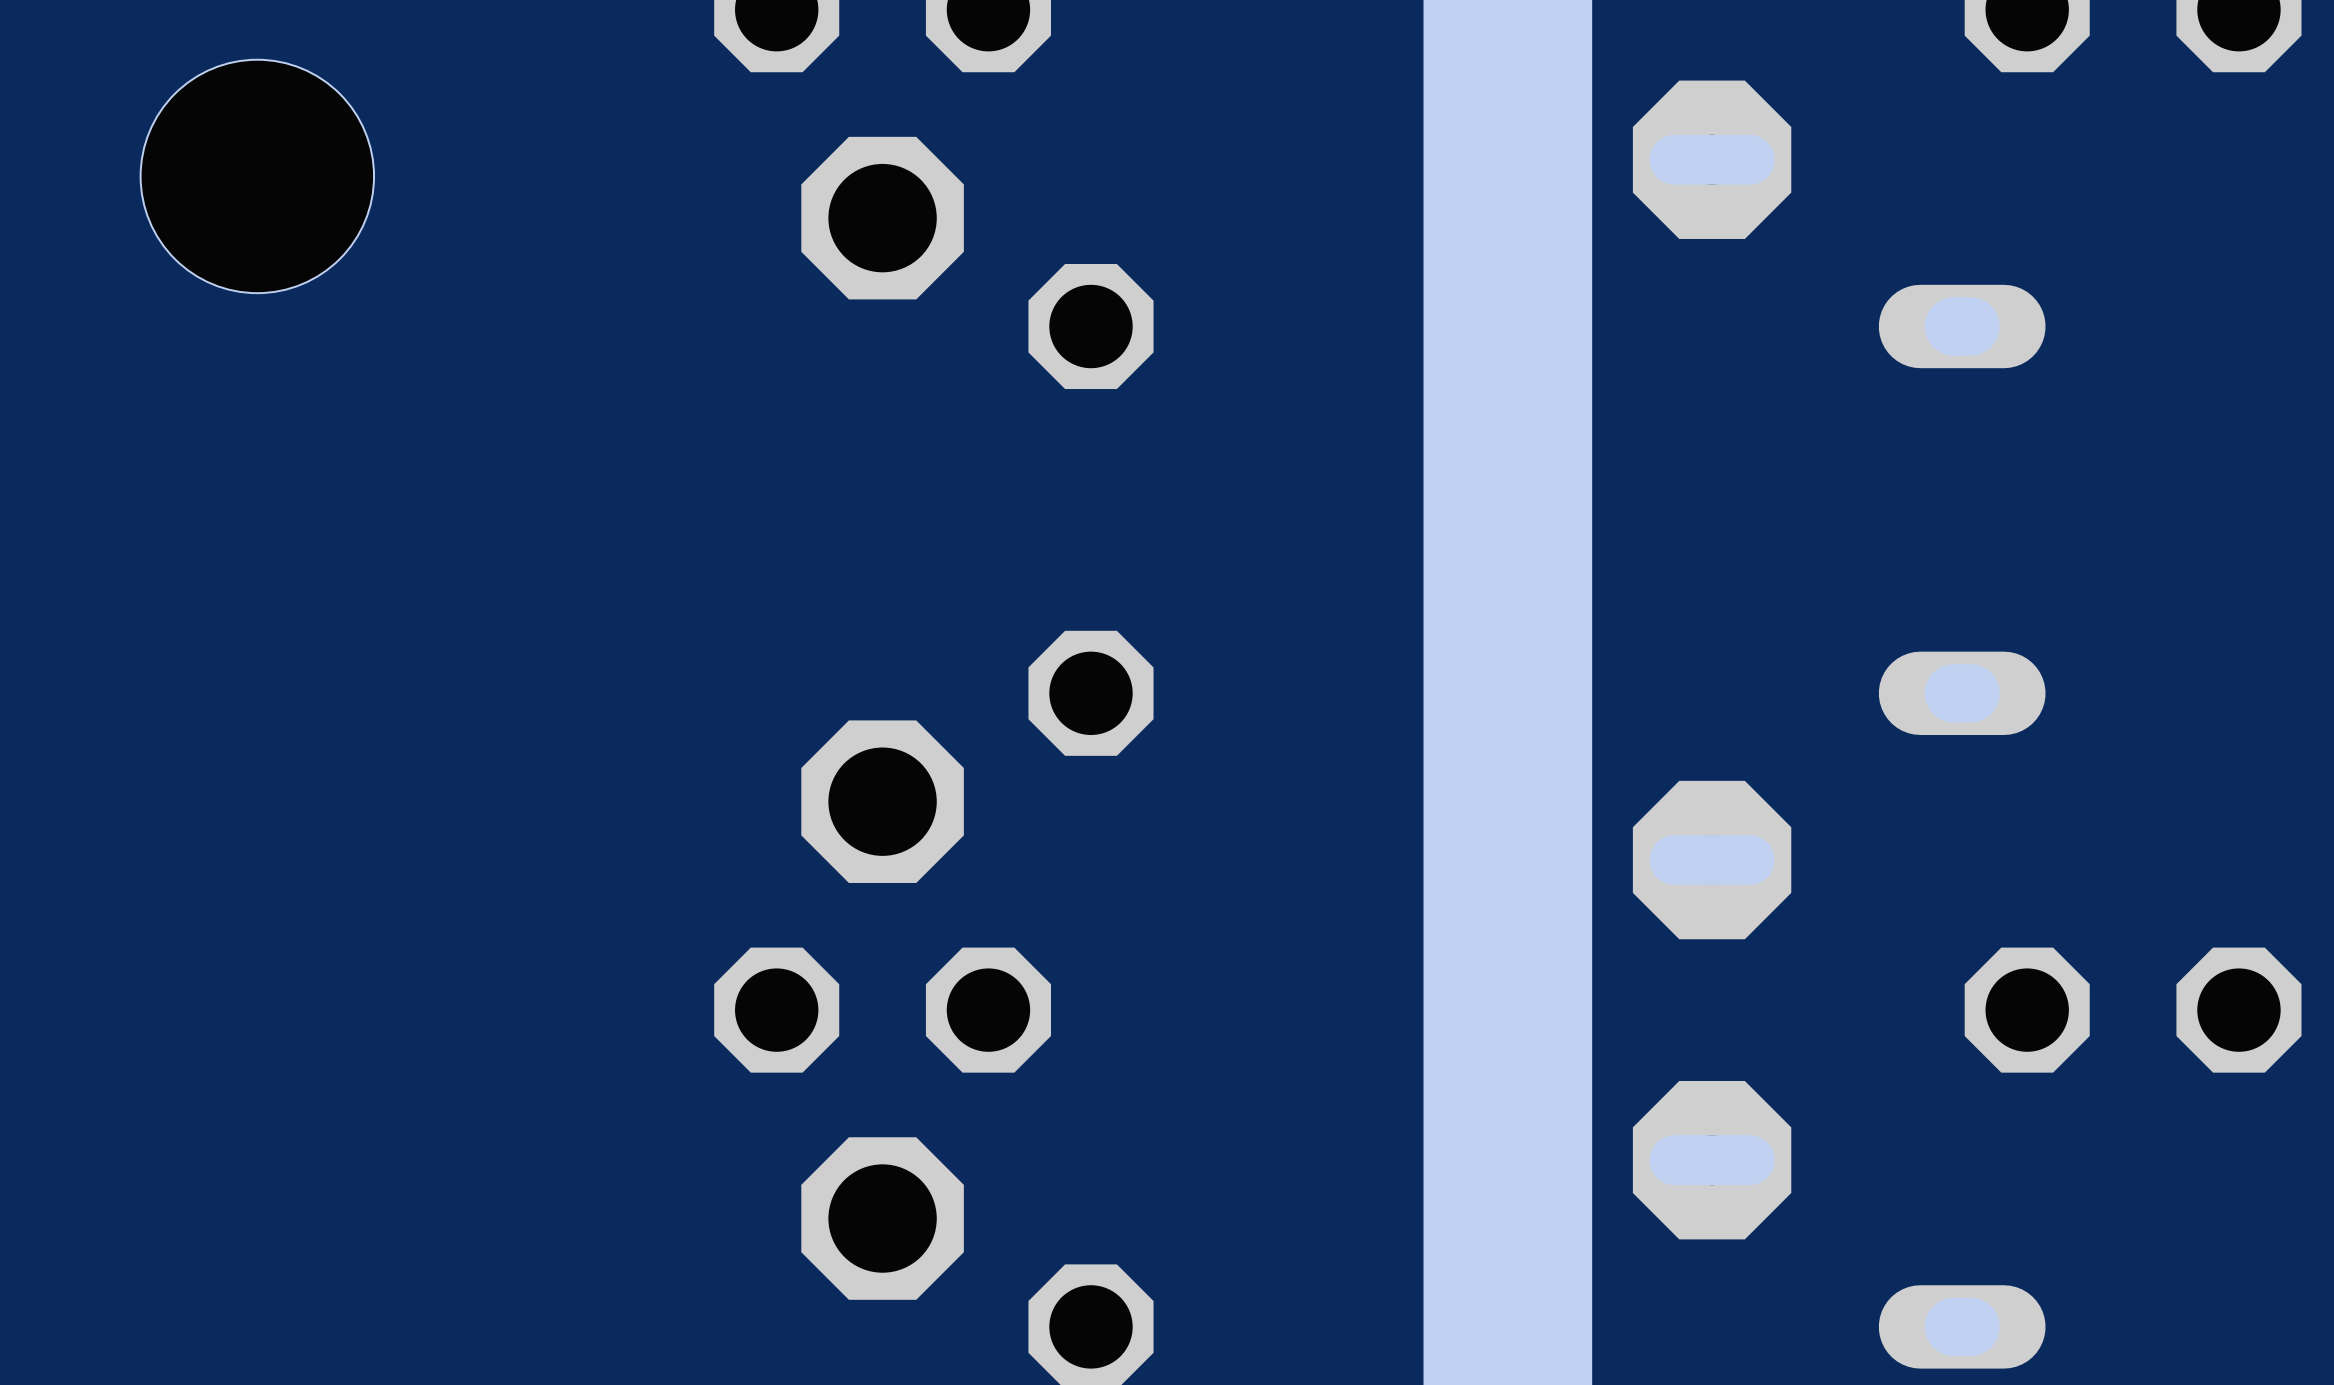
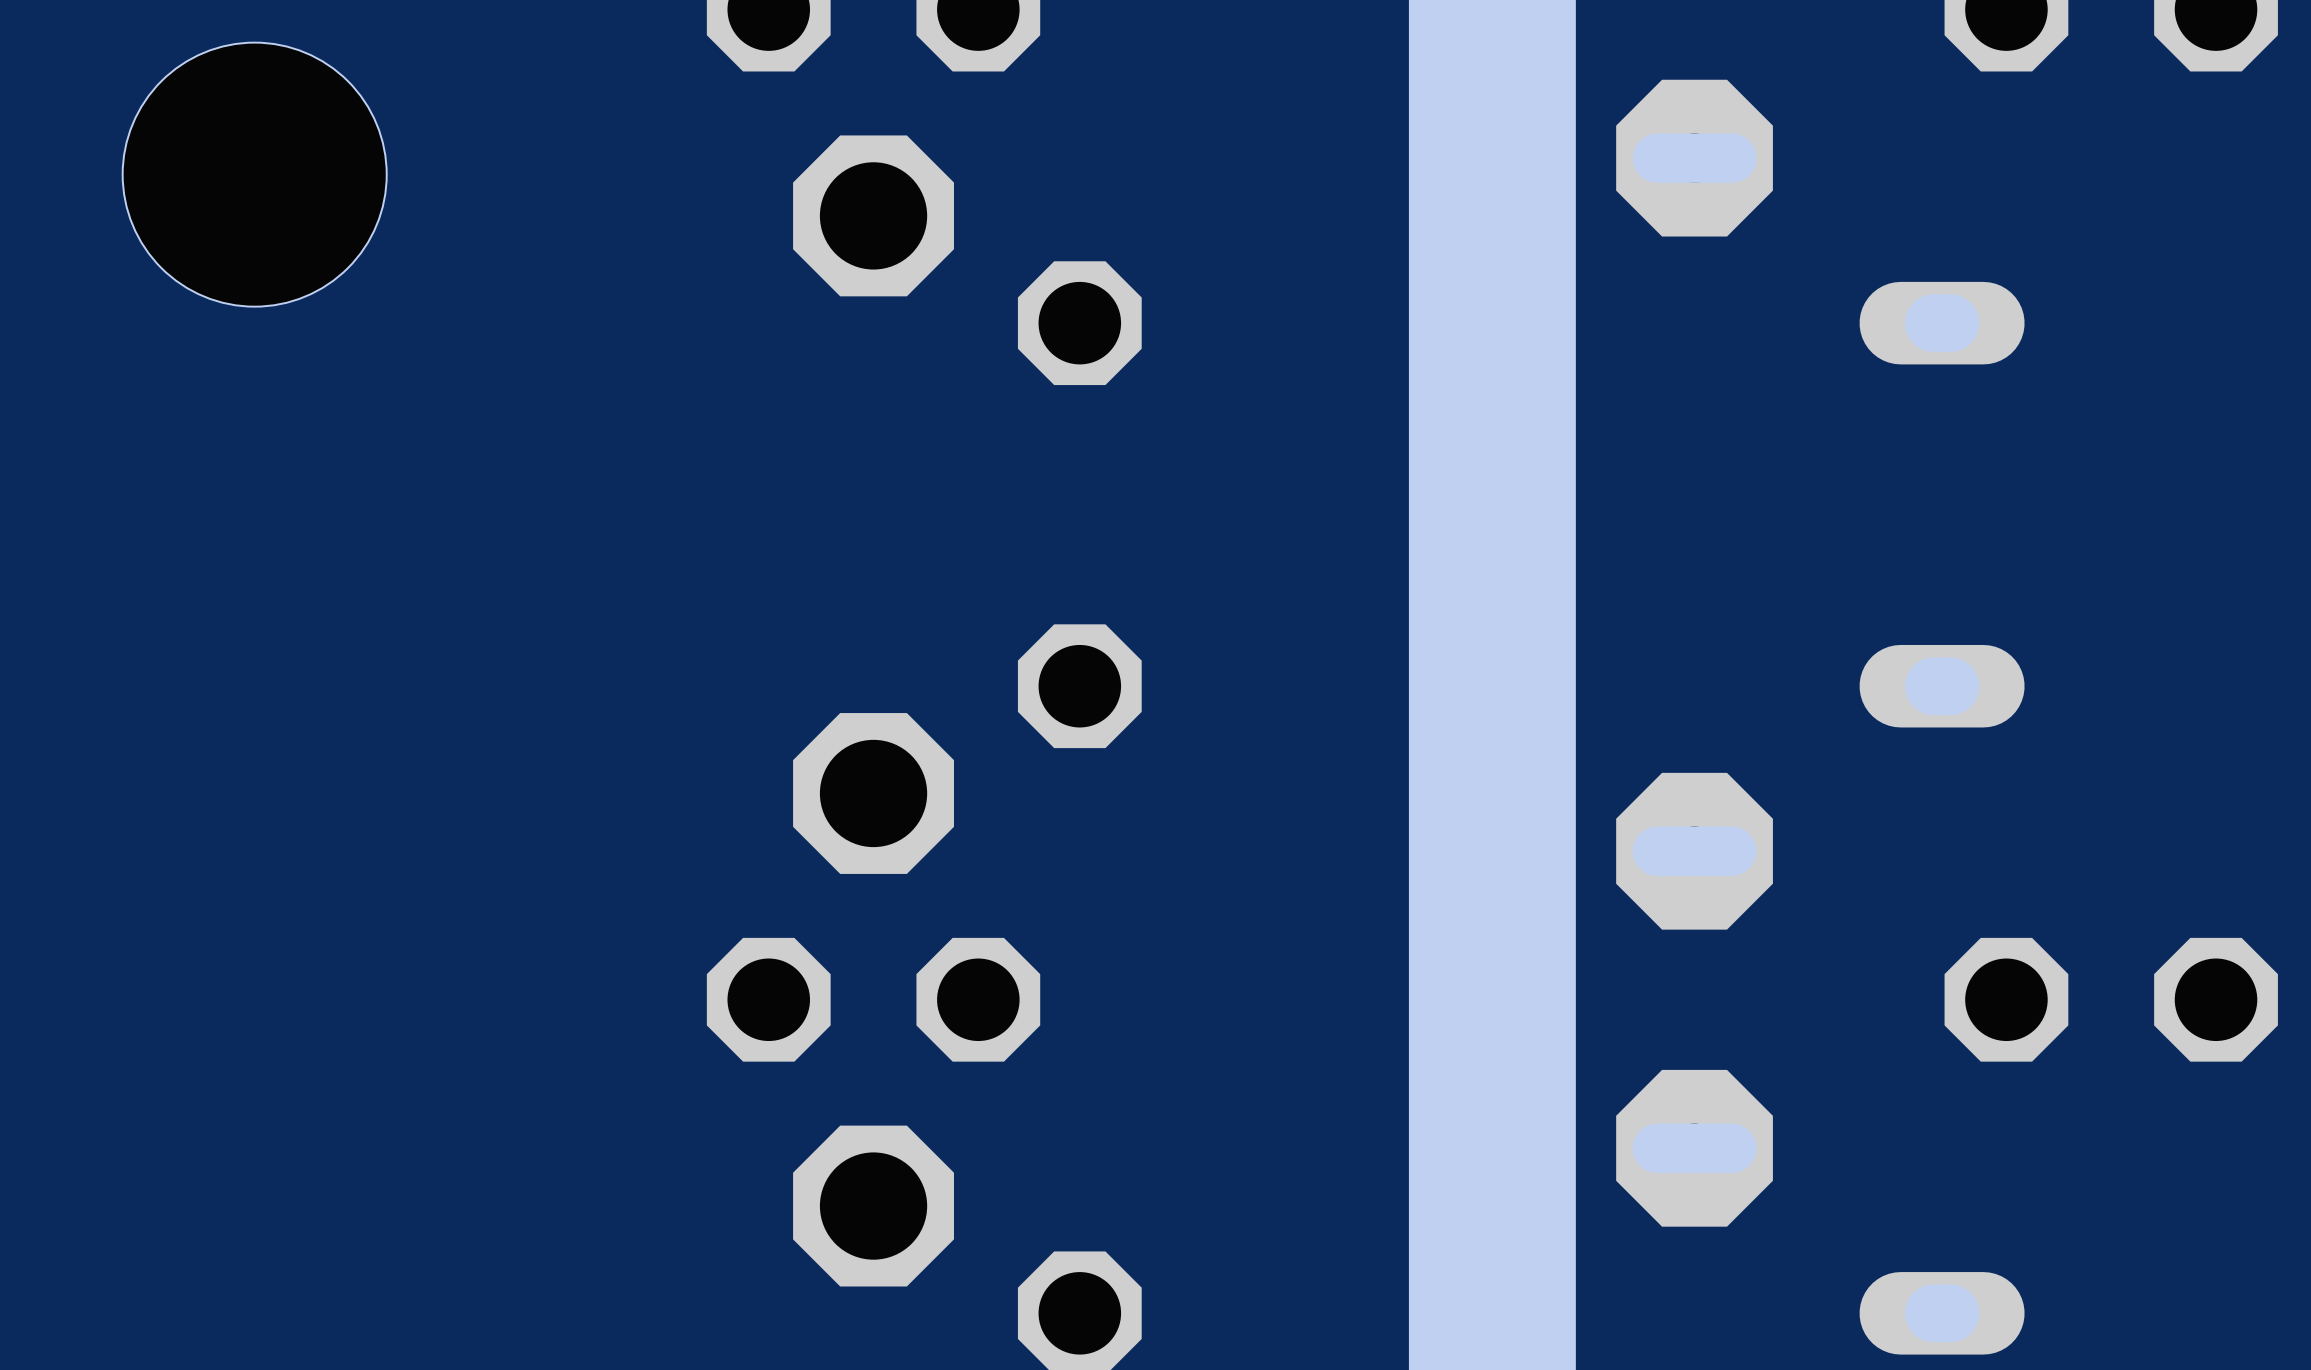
hole size: [140, 59, 375, 294] -> [122, 42, 387, 307]

